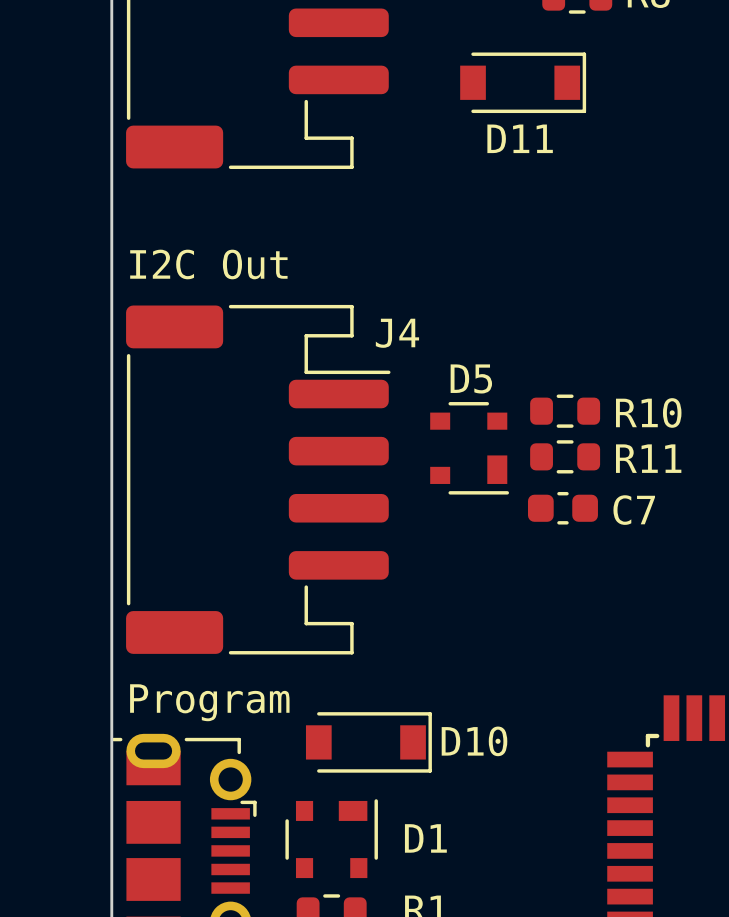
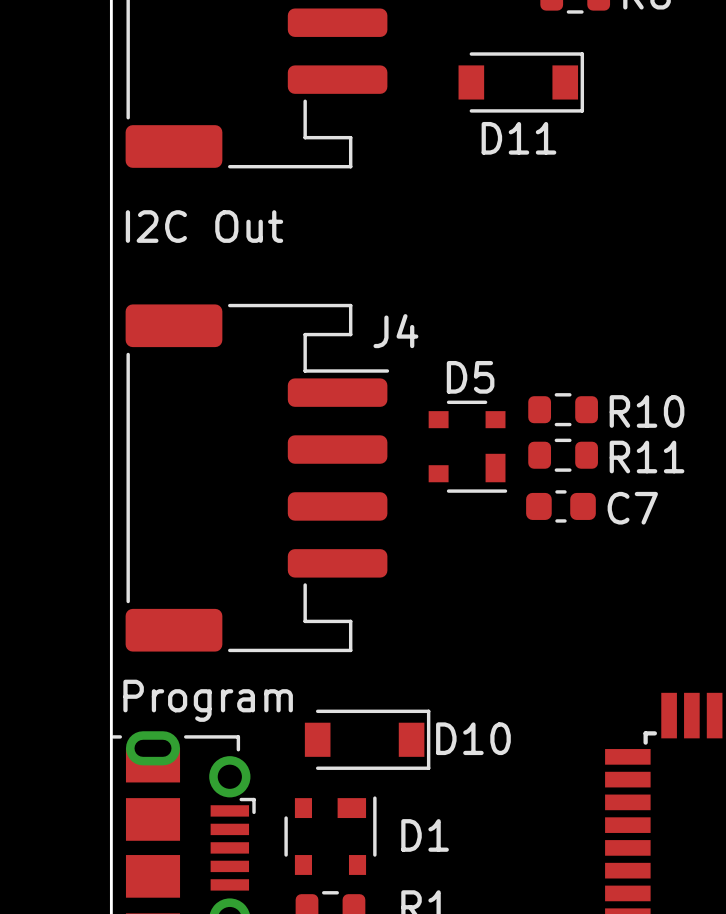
text position: I2C Out (208, 264) -> I2C Out (204, 226)

